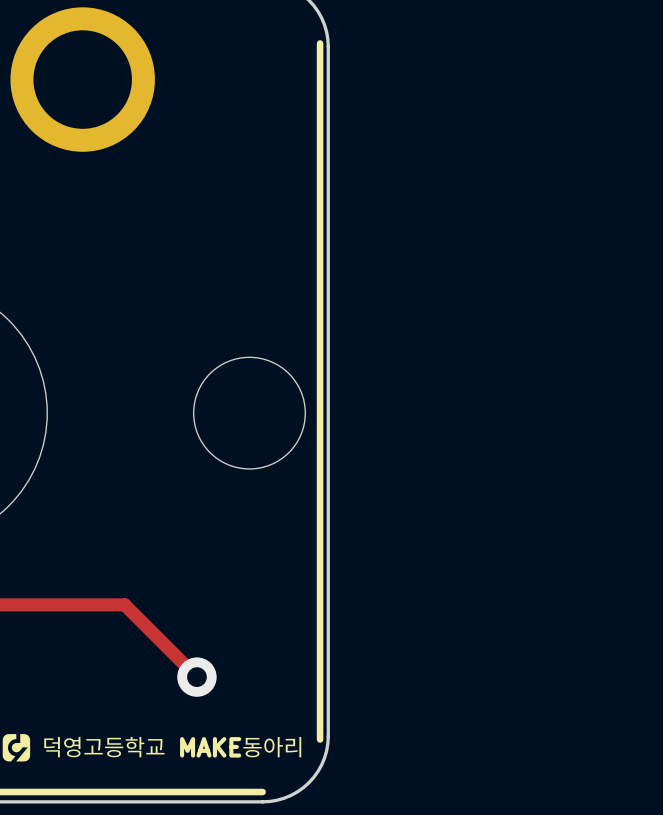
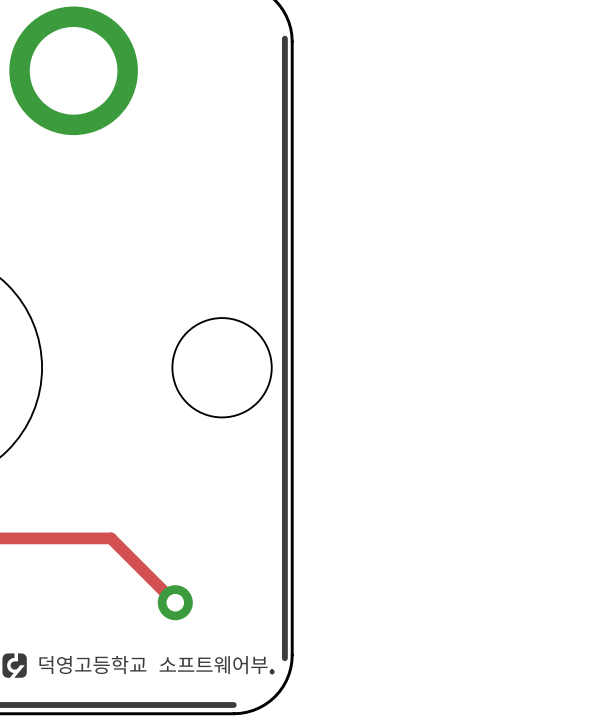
text: 덕영고등학교 MAKE동아리 (172, 747) -> 덕영고등학교 소프트웨어부. (156, 665)

